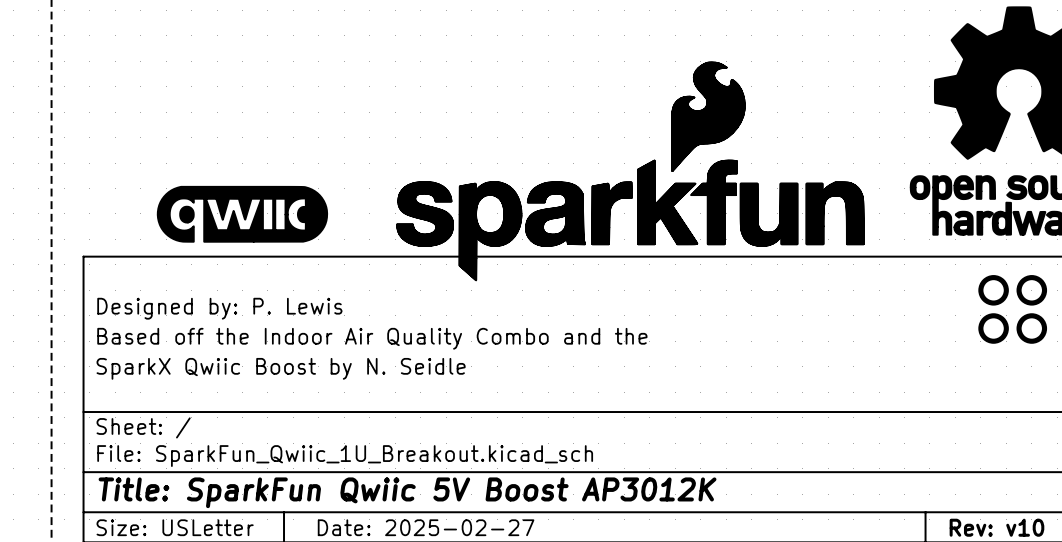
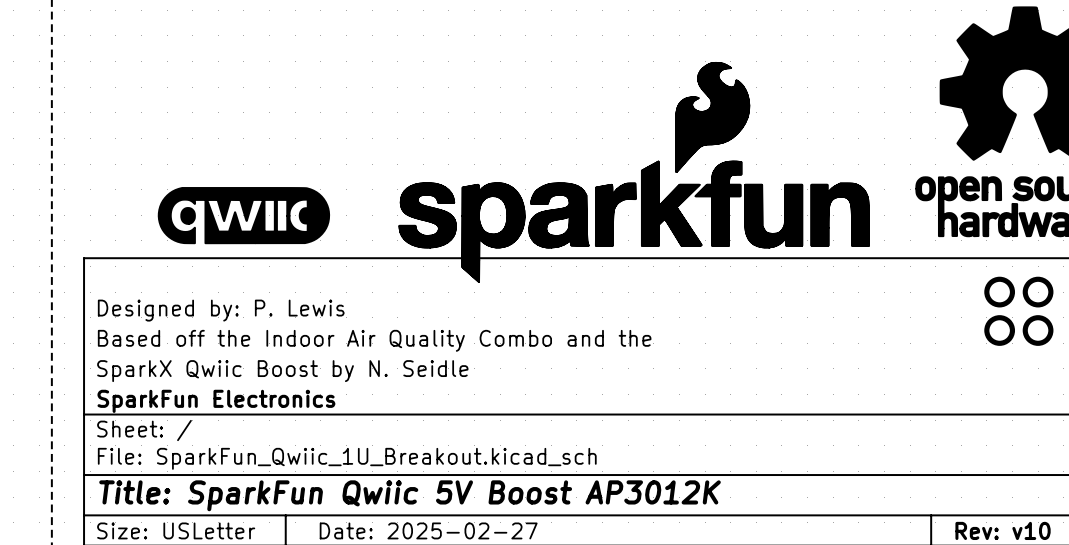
title block: none -> SparkFun Electronics (216, 401)

